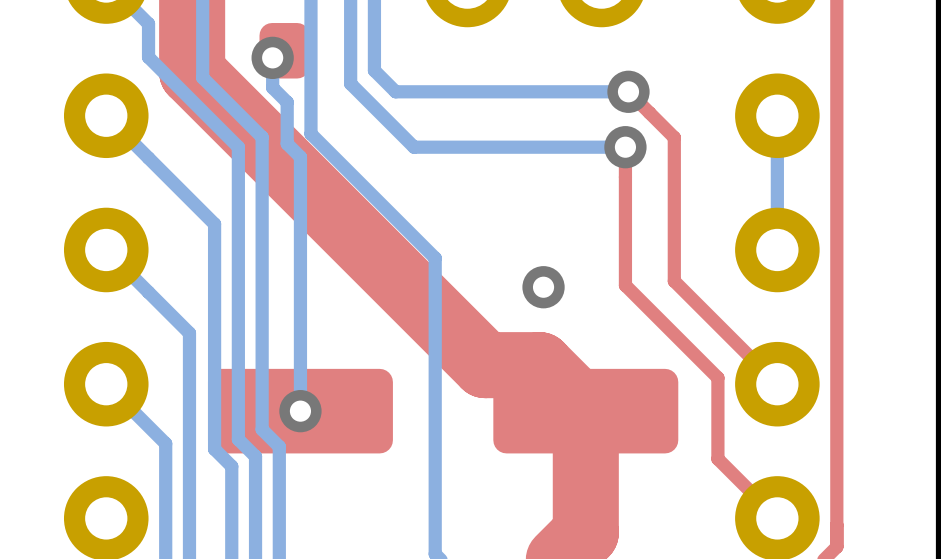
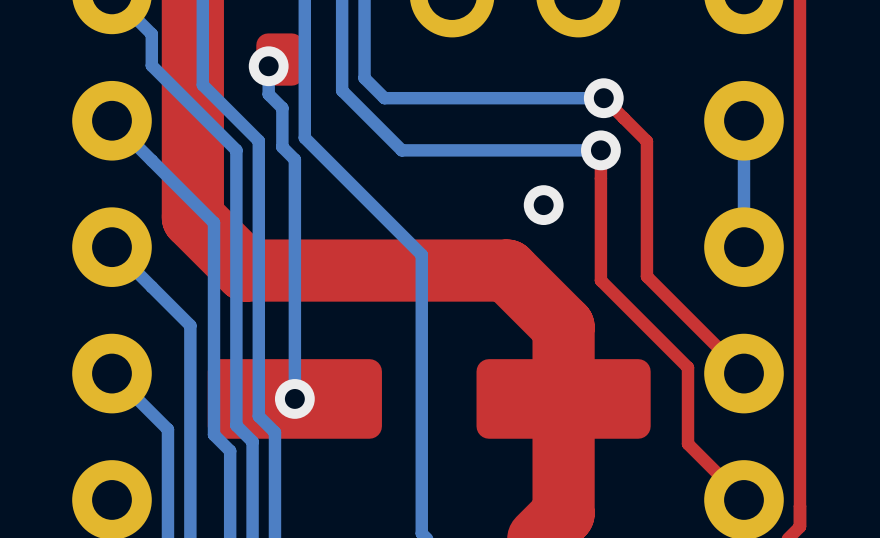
top track: (192, 72) (485, 365) (539, 365) (585, 411) -> (192, 79) (192, 217) (245, 270) (507, 270) (563, 327) (563, 398)
via position: (543, 287) -> (543, 205)

